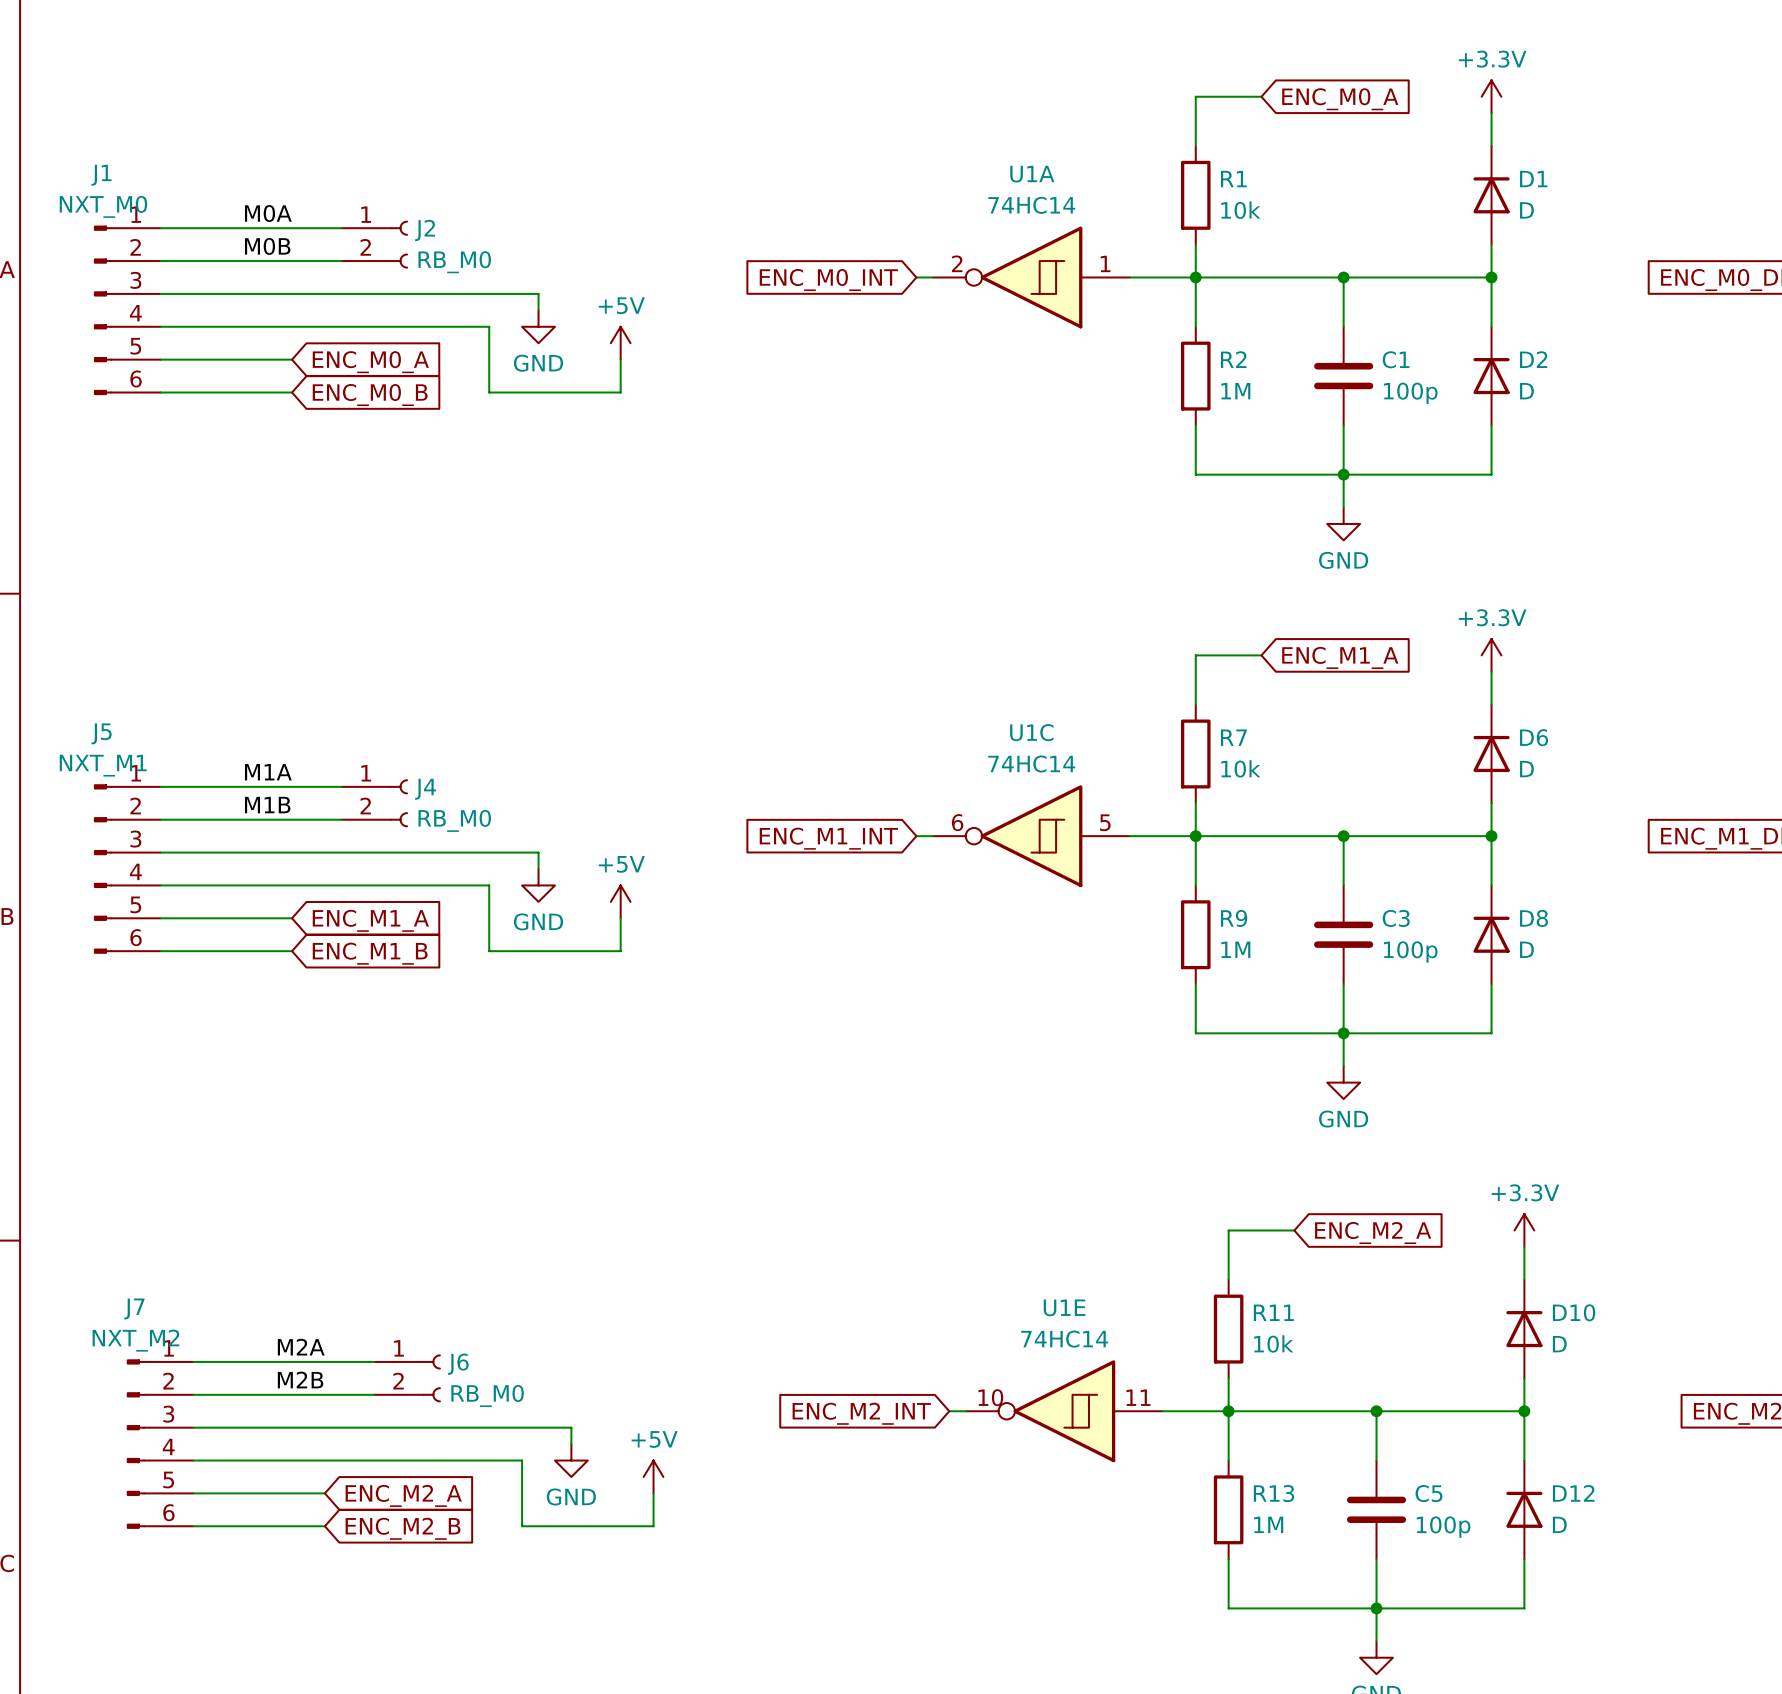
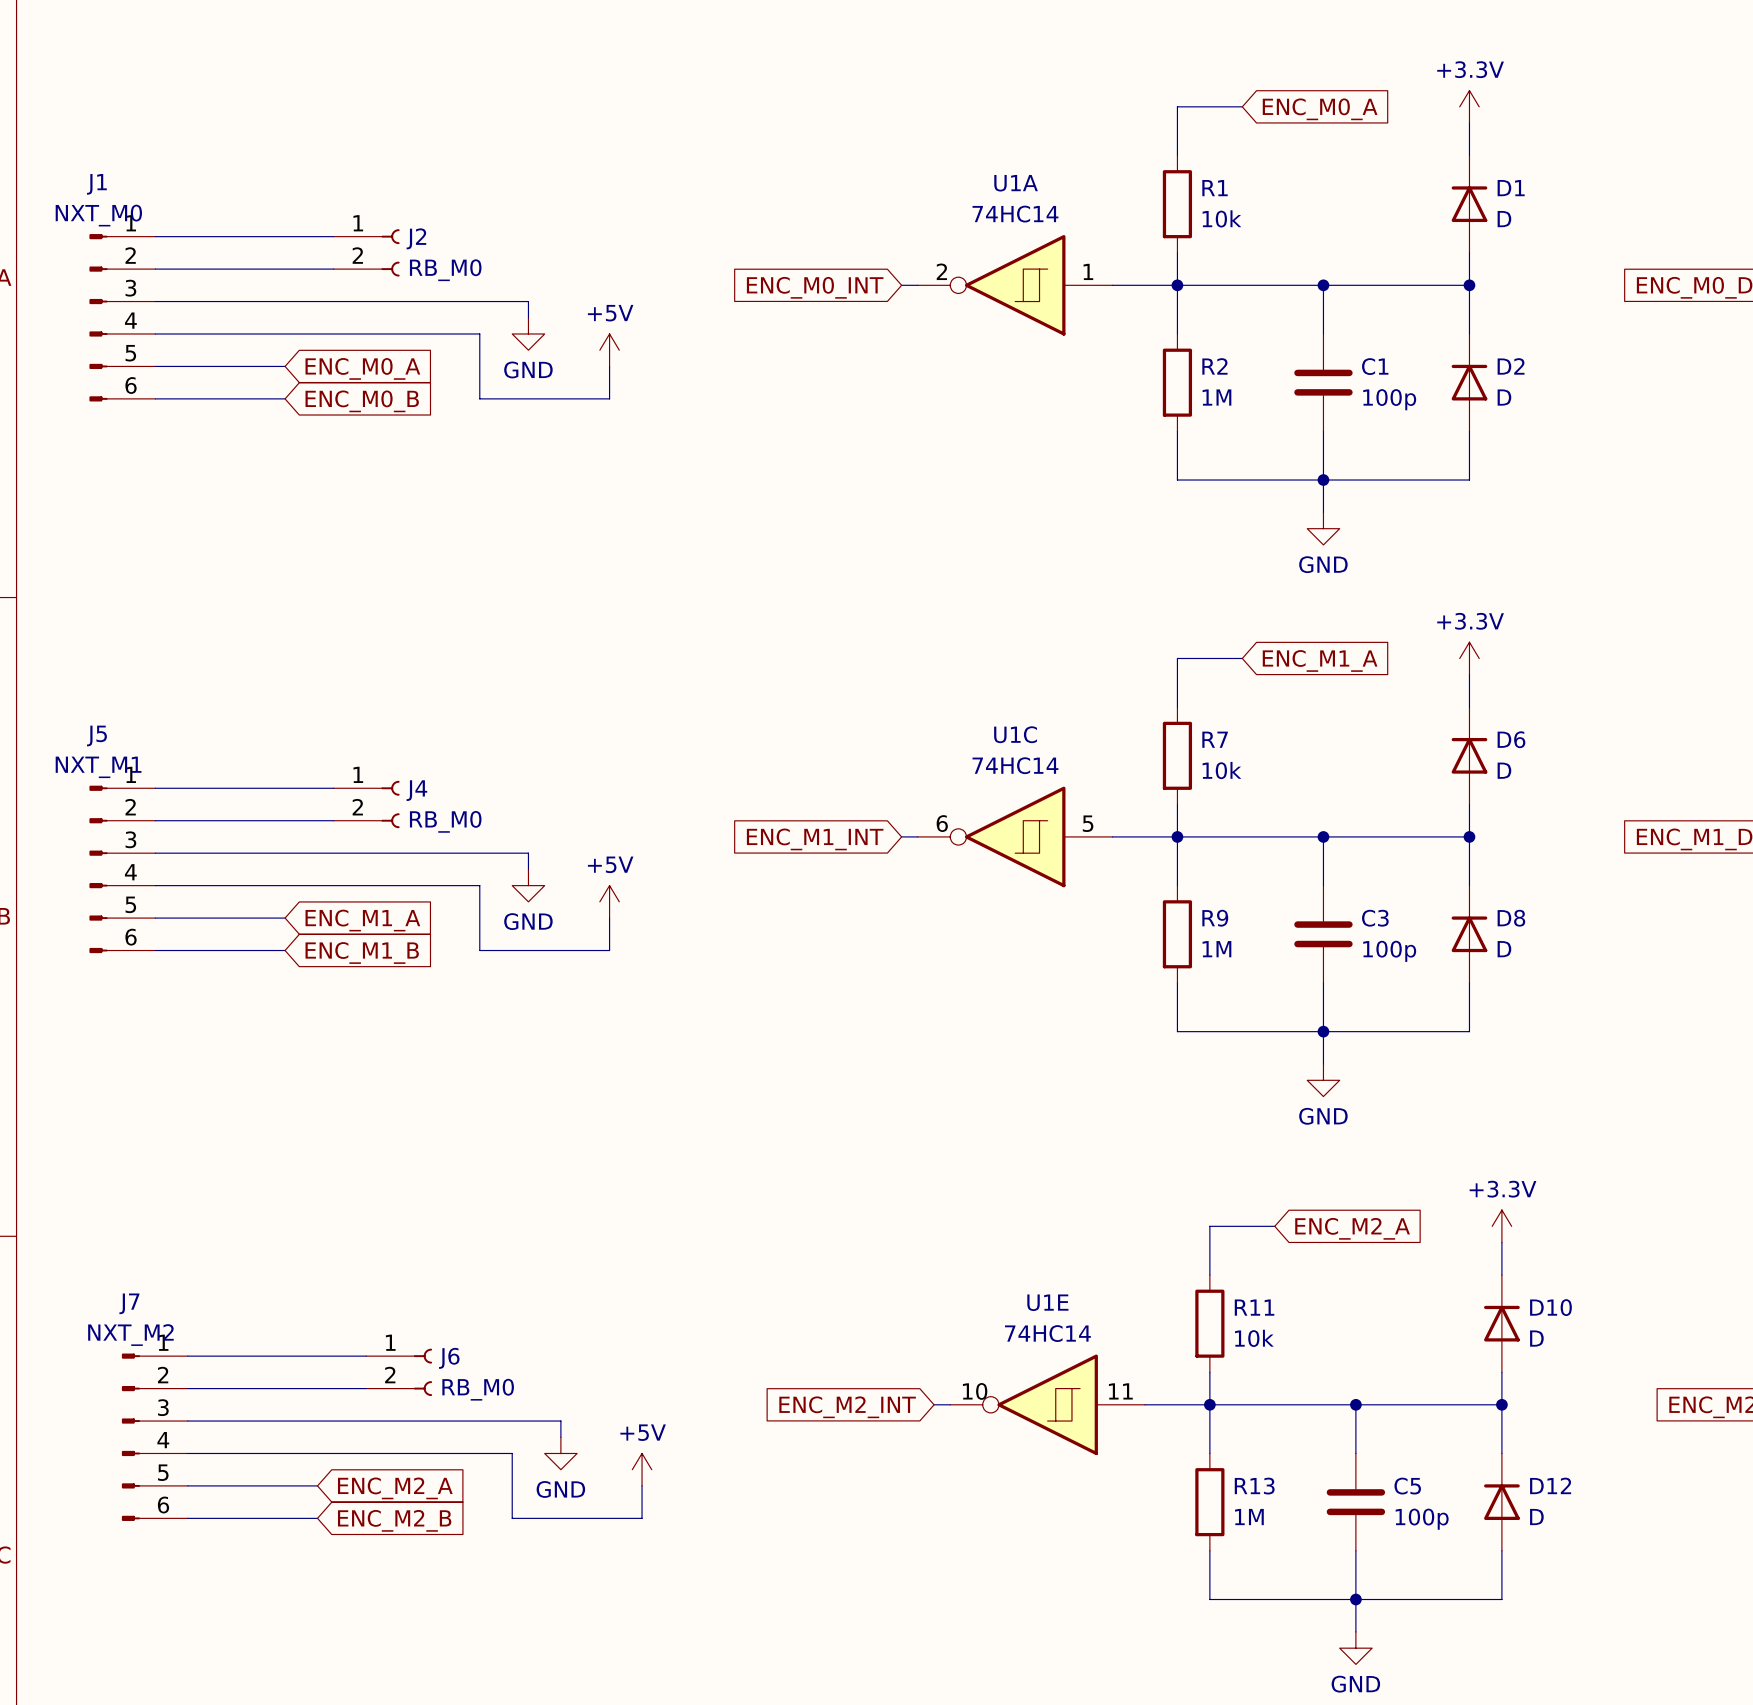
label: M0A (268, 213) -> none
label: M0B (267, 246) -> none
label: M1A (268, 772) -> none
label: M1B (267, 805) -> none
label: M2A (301, 1347) -> none
label: M2B (300, 1380) -> none

